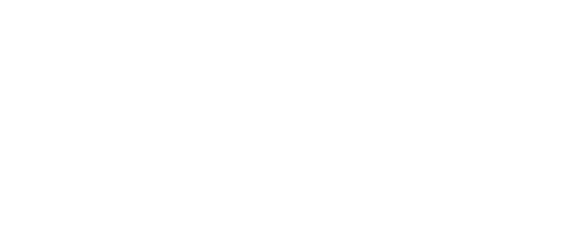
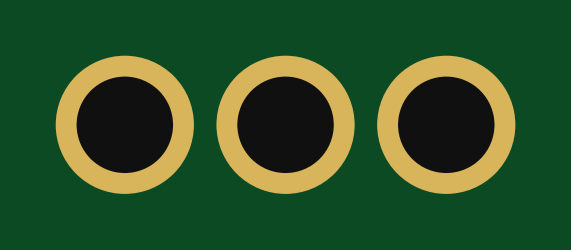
part: none -> (124, 124)
part: none -> (285, 124)
part: none -> (446, 124)

